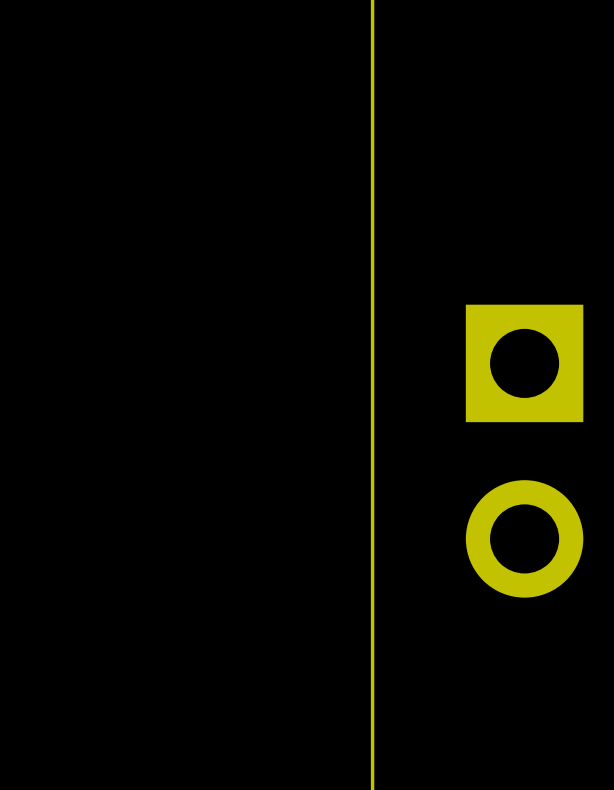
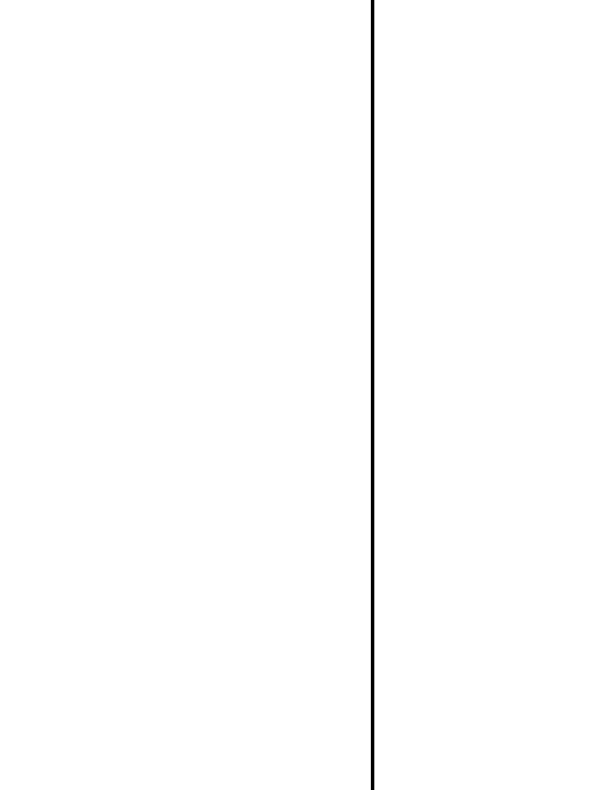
part: (524, 451) -> none

